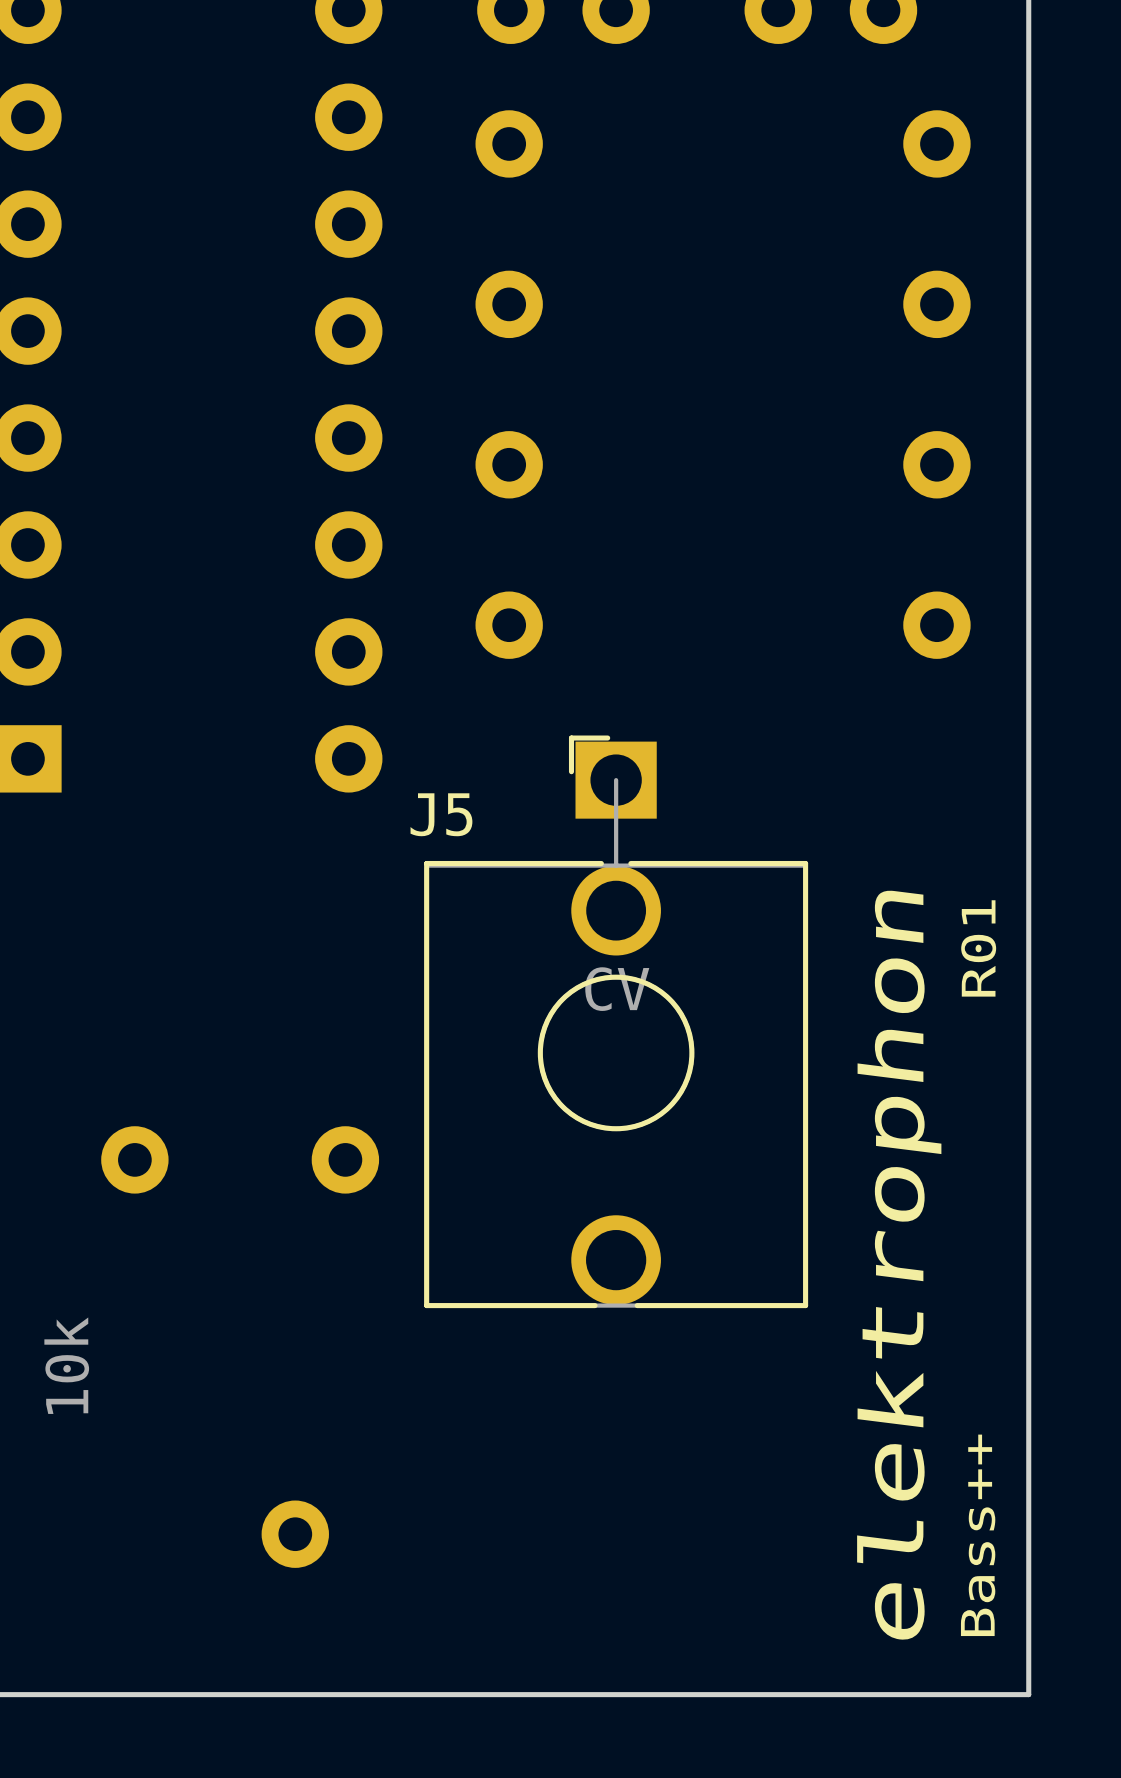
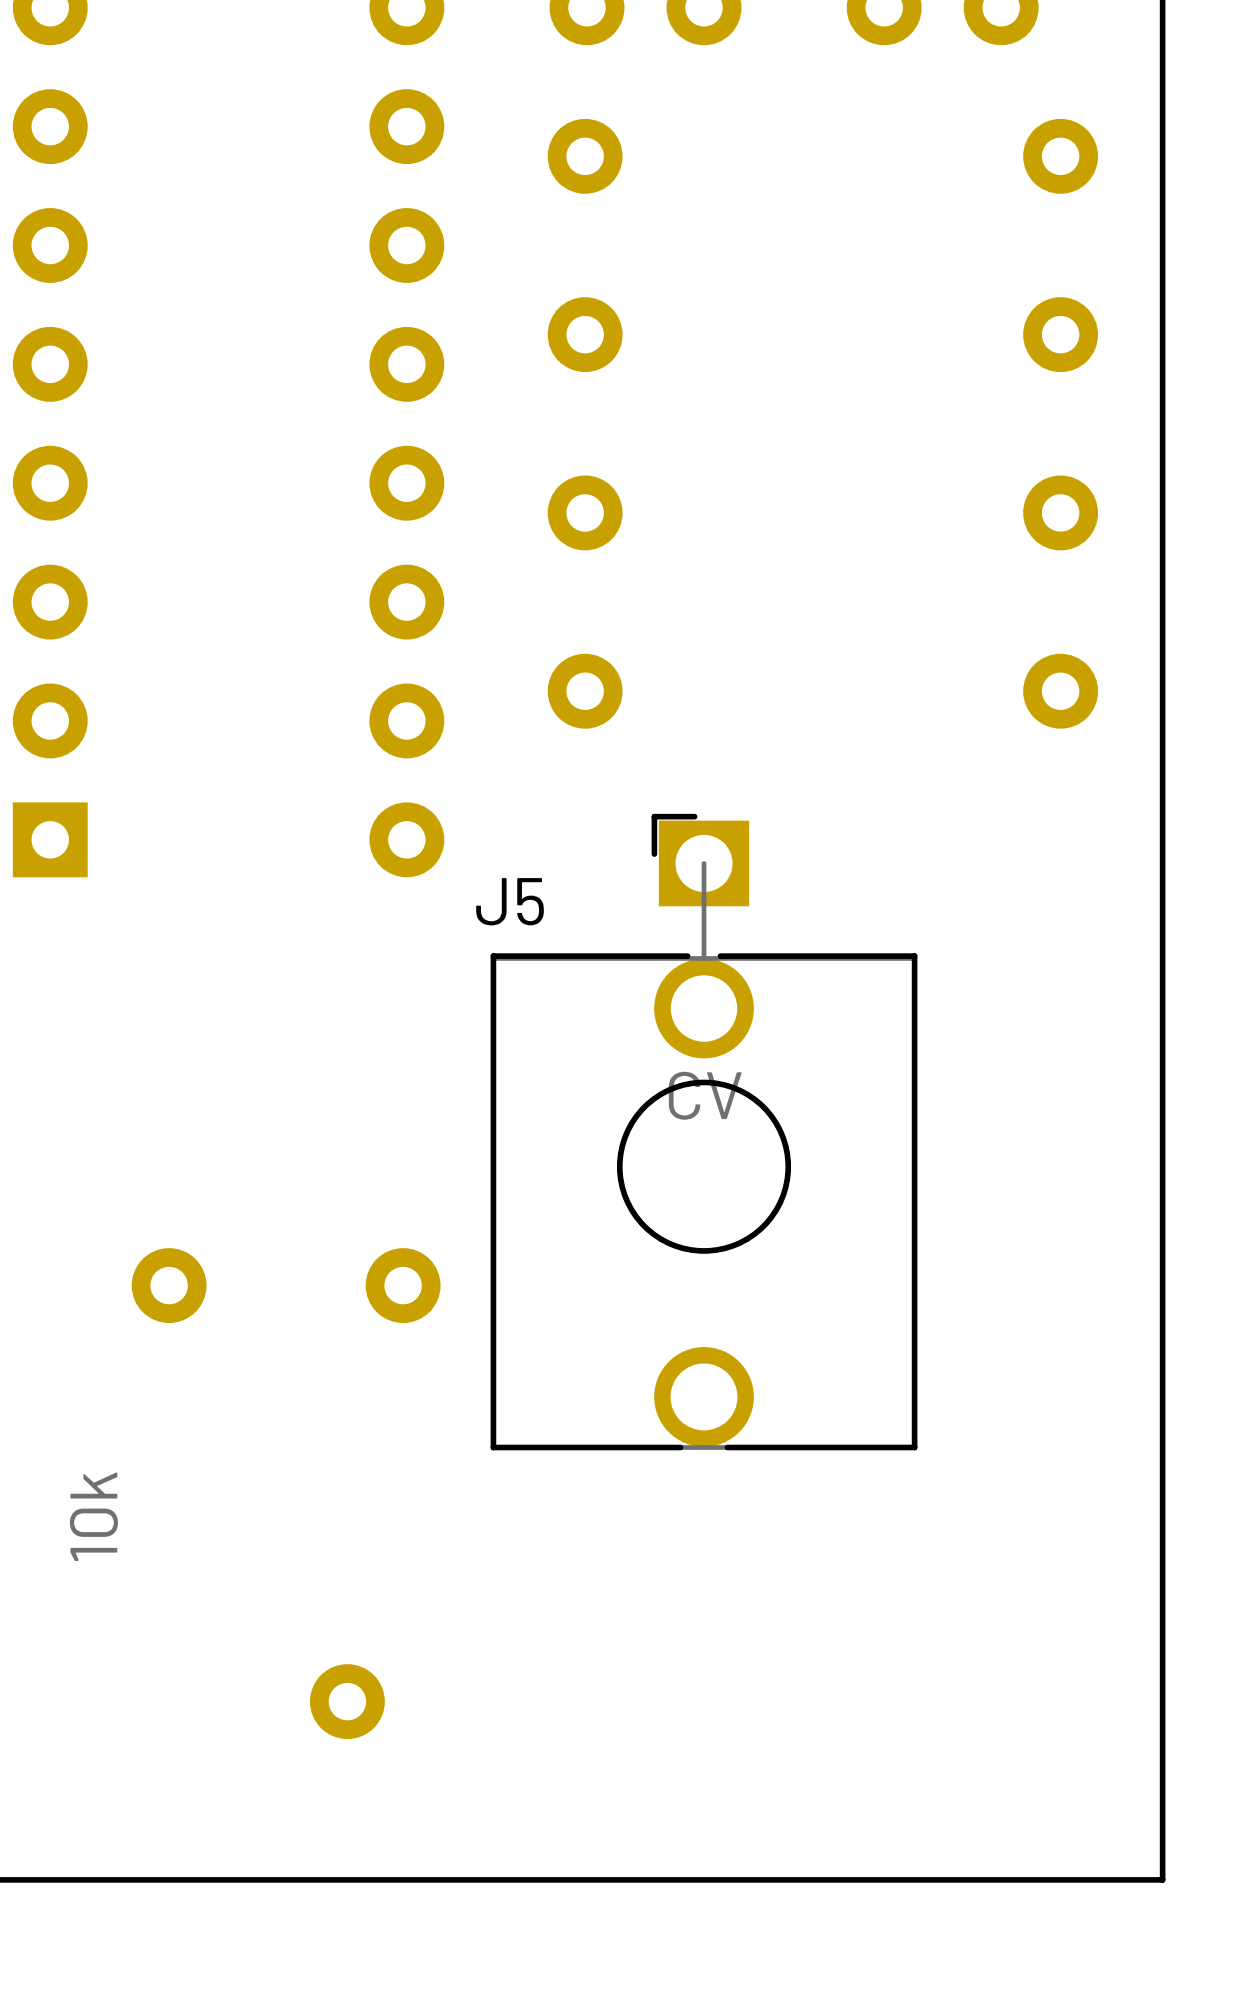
drawing: [857, 889, 997, 1641] -> none

